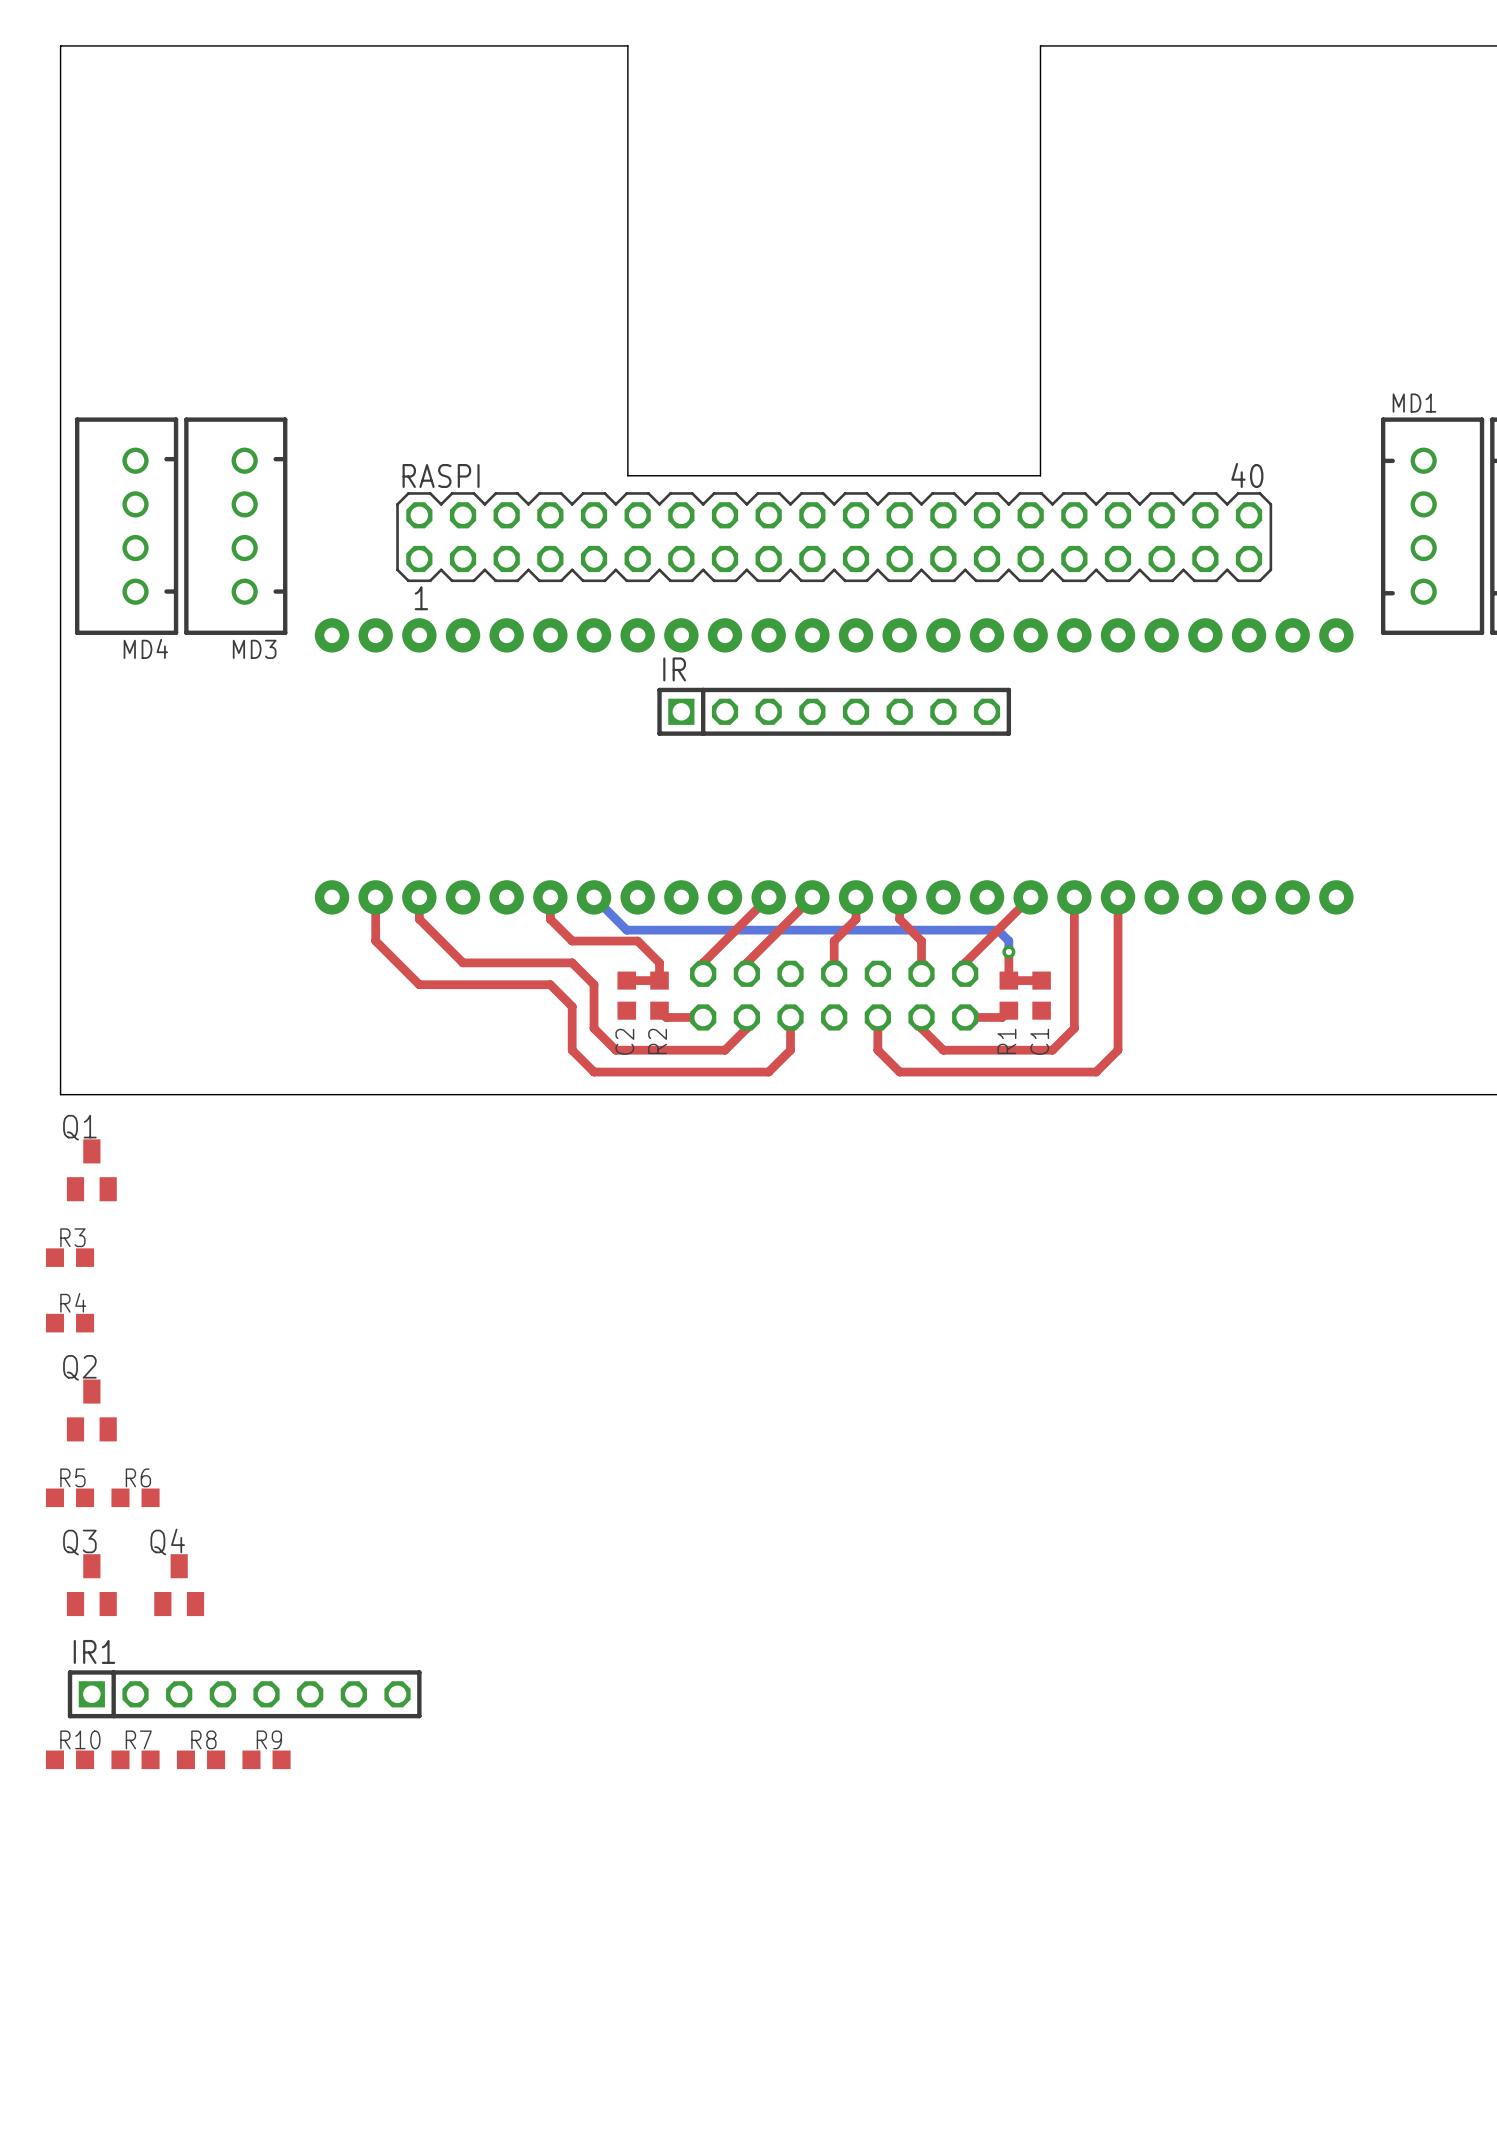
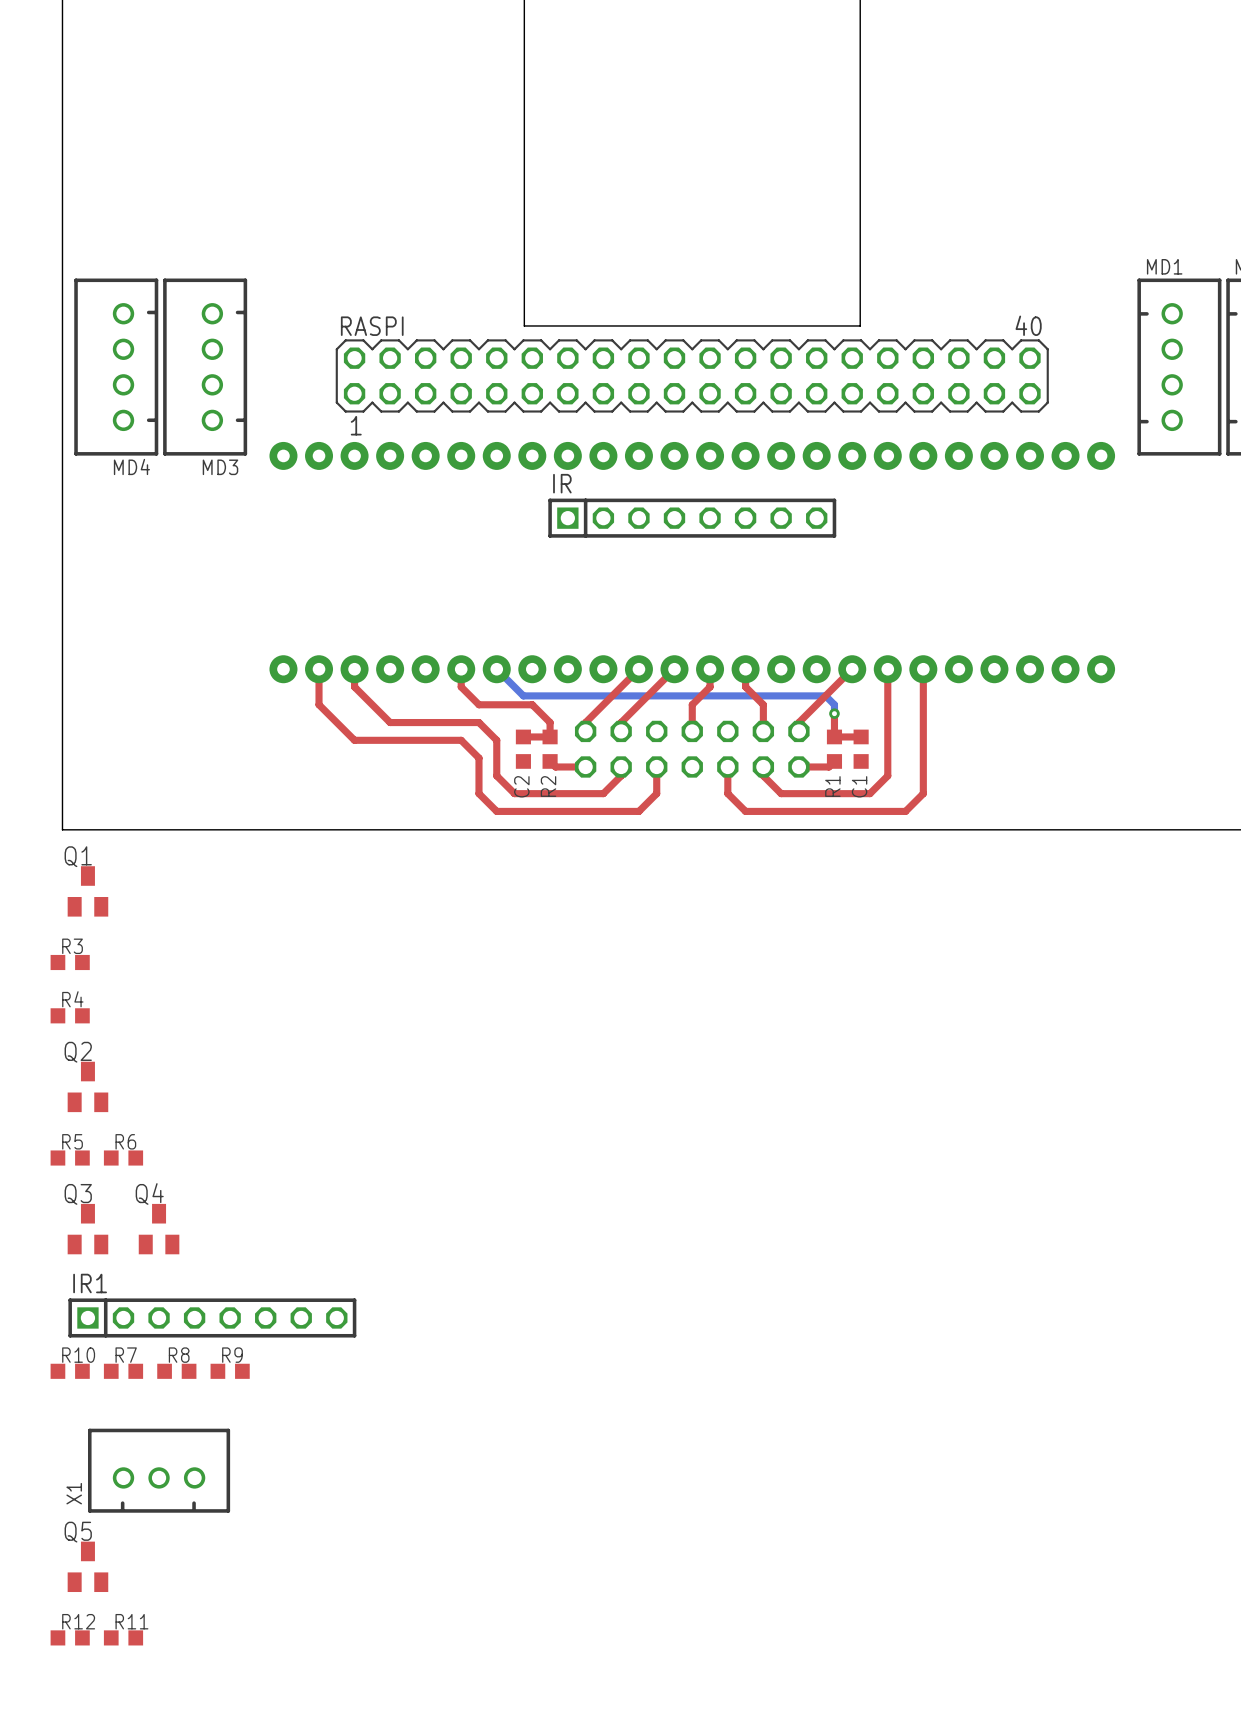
X1: none -> (159, 1470)
Q5: none -> (87, 1566)
R12: none -> (70, 1637)
R11: none -> (123, 1637)

